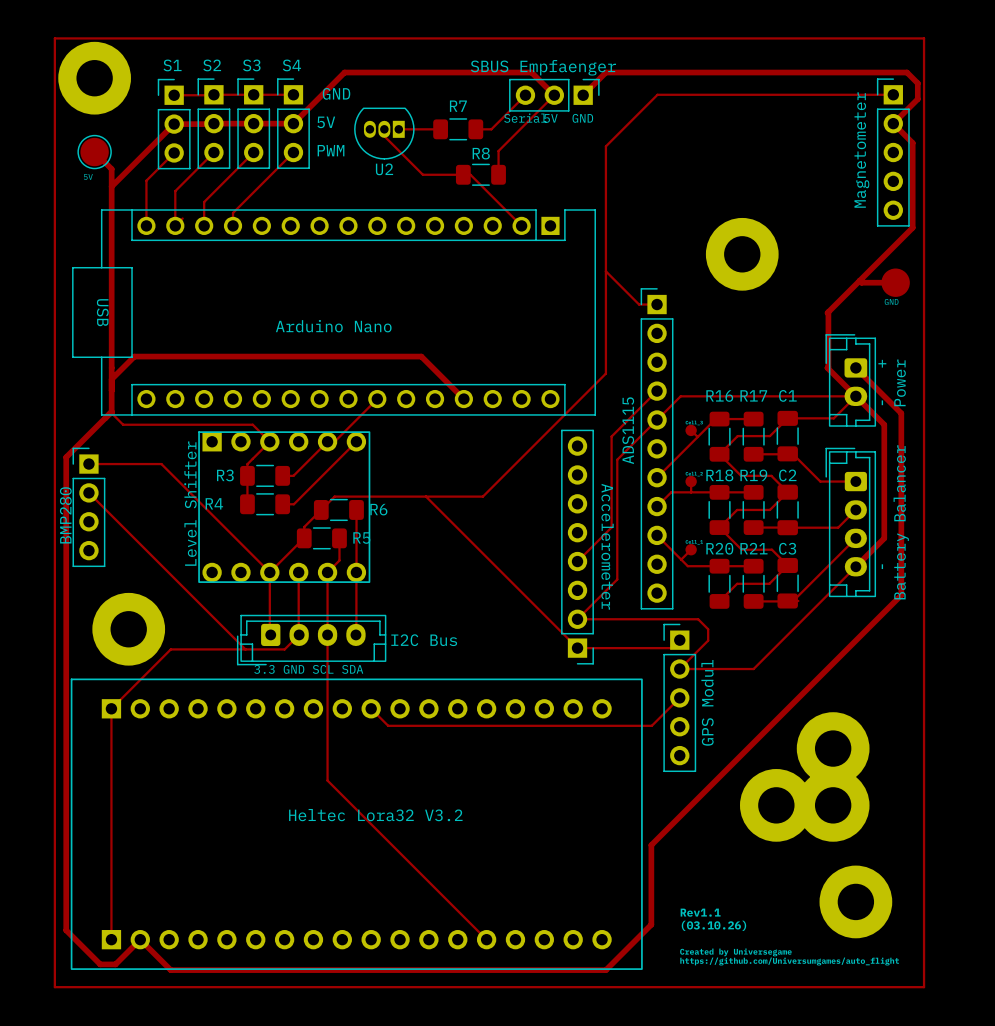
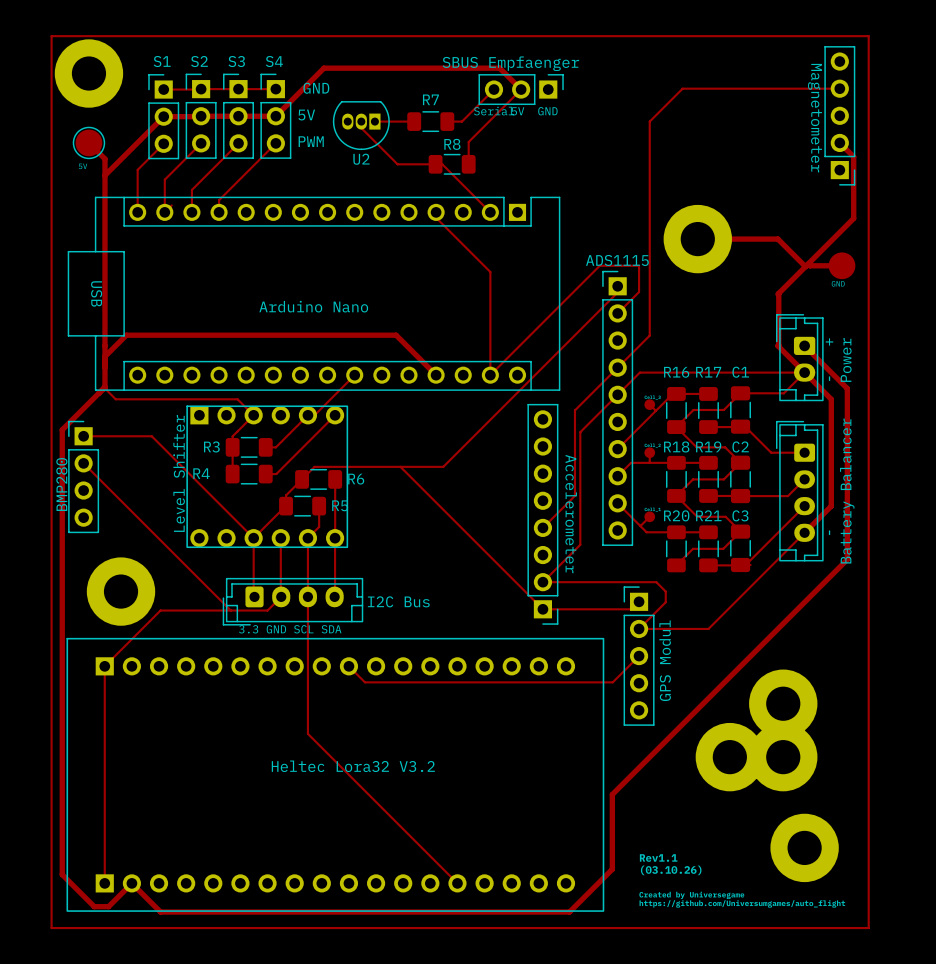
track: none -> (839, 88) (682, 88) (649, 121) (649, 335) (617, 367)
track: (583, 95) (605, 72) (907, 72) (917, 83) (917, 99) (893, 123) (912, 143) (912, 227) (908, 232) -> (839, 142) (853, 156) (853, 218)
track: (893, 98) (893, 94) (657, 94) (605, 146) (605, 373) (482, 496) (471, 496) -> none
part: none -> (839, 115)
part: (893, 152) -> none
track: none -> (436, 212) (436, 217) (490, 271) (490, 375) (599, 265) (639, 265) (639, 292) (617, 313)
track: none -> (697, 239) (777, 239) (805, 266)
track: (605, 271) (639, 304) (657, 304) -> (443, 466) (617, 292) (617, 286)
ADS1115 footprint: [640, 288, 674, 610] -> [602, 270, 634, 546]
ADS1115 name position: ADS1115 (628, 430) -> ADS1115 (617, 260)

